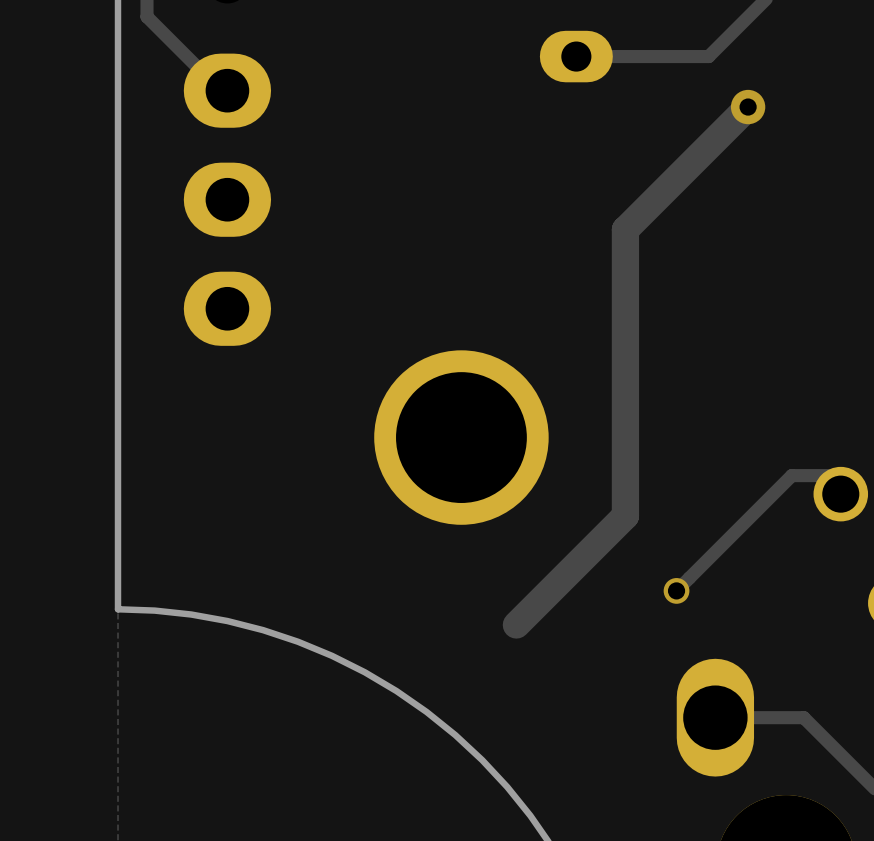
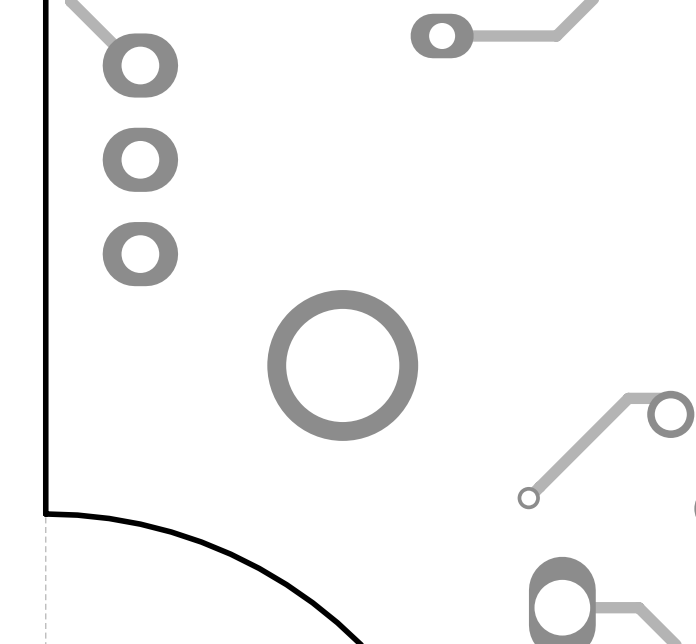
track: (748, 107) (625, 229) (625, 515) (516, 624) -> none
via: (748, 107) -> none

